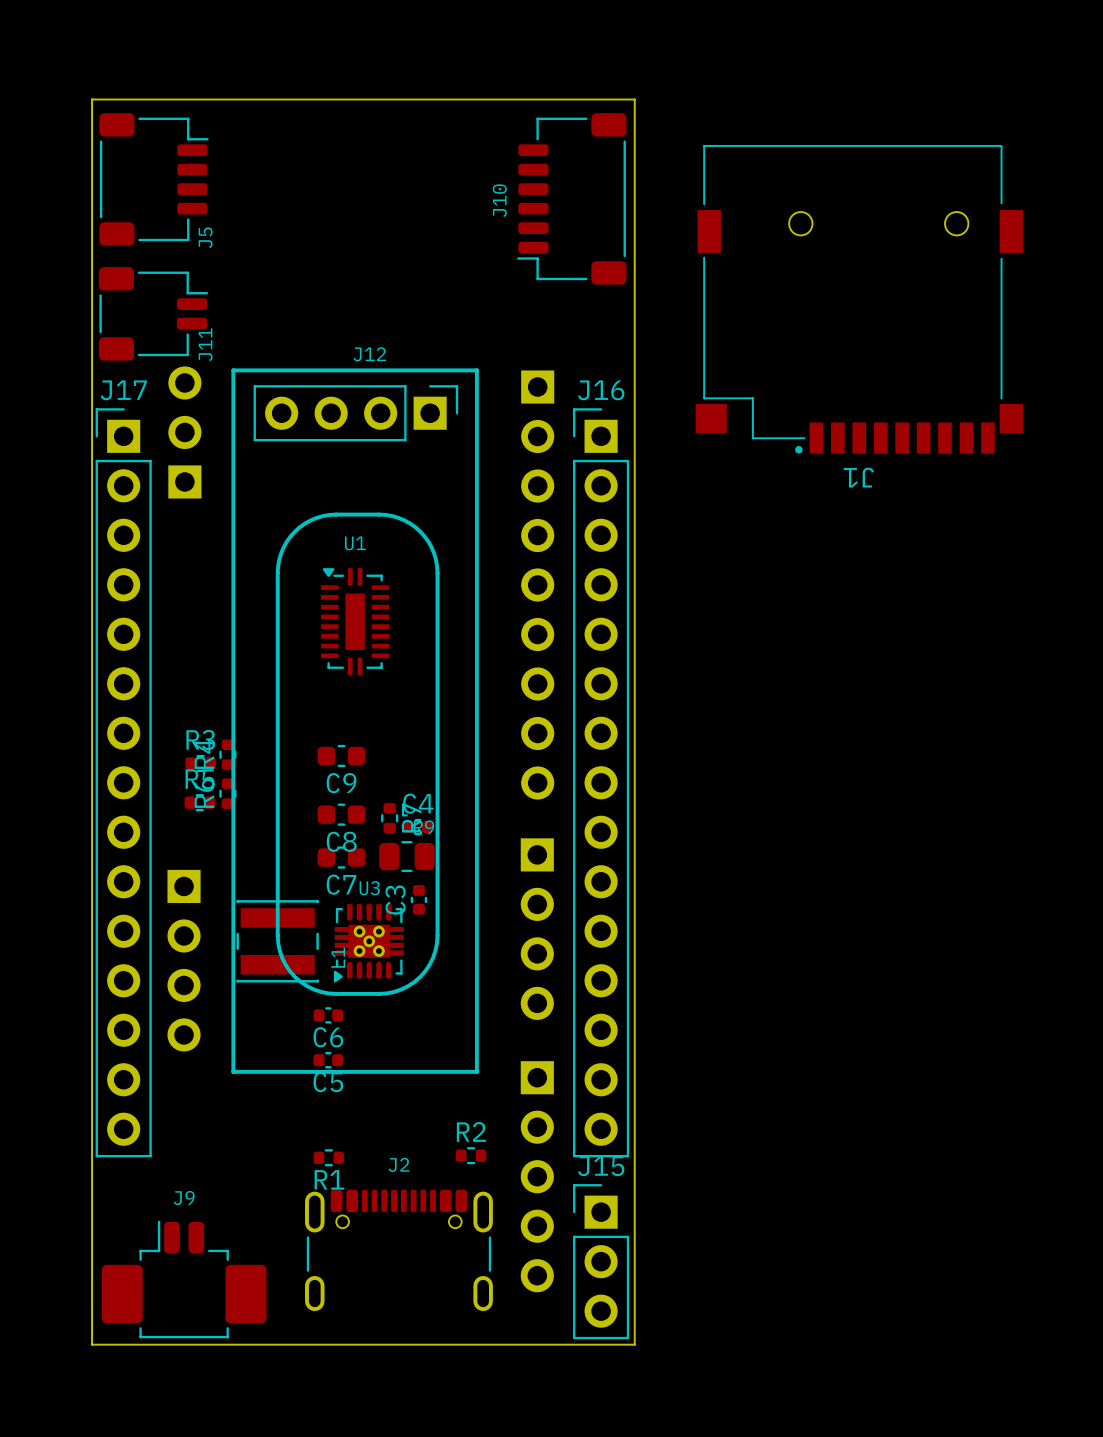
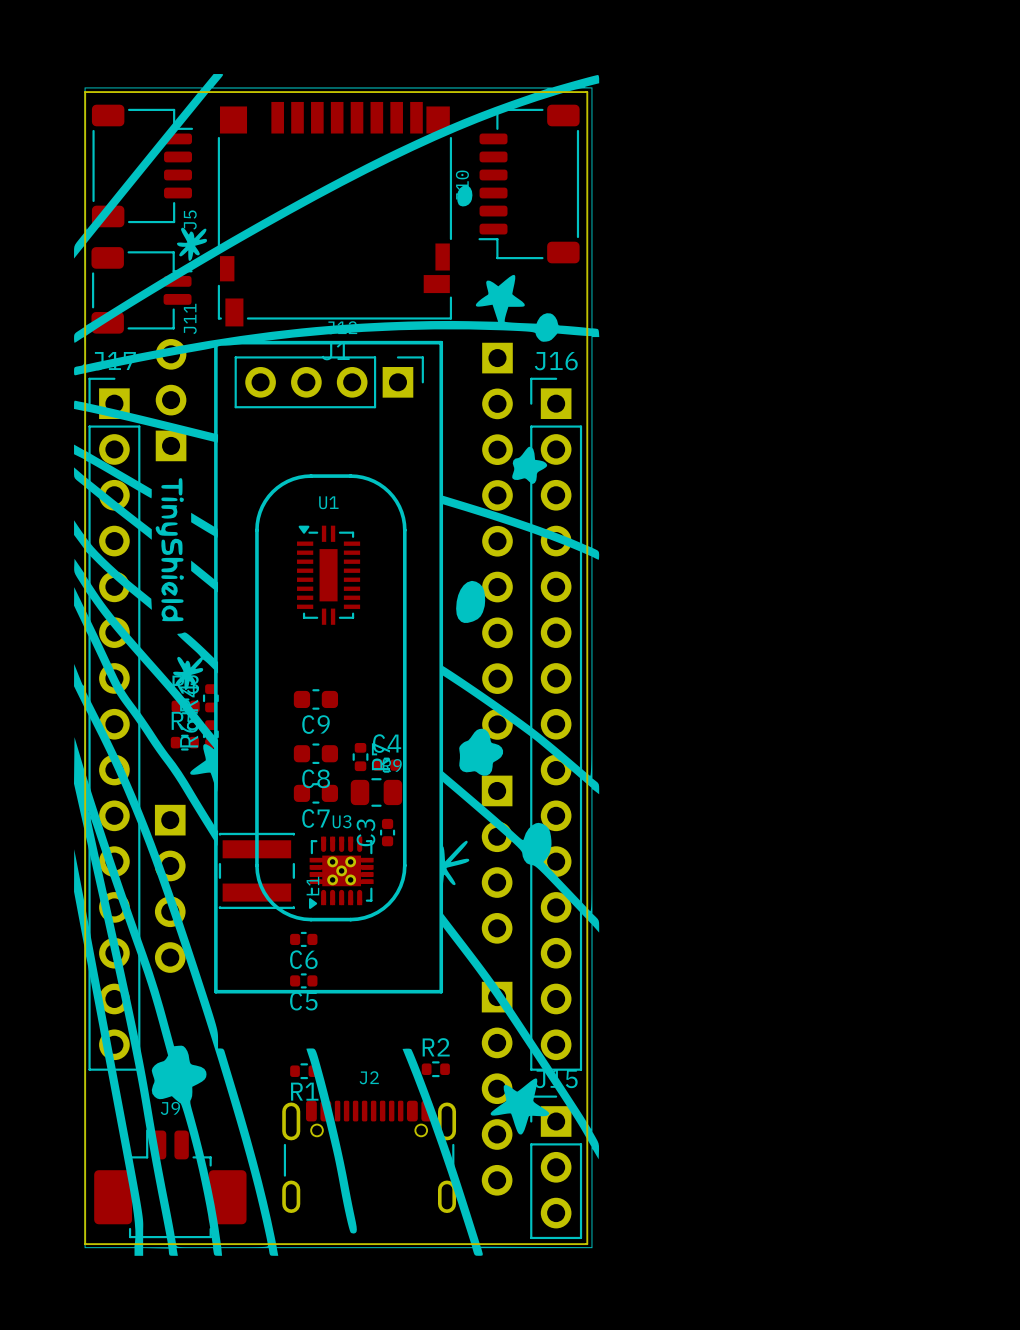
drawing: none -> [74, 74, 600, 1256]
J1 footprint: [695, 144, 1023, 454] -> [217, 101, 453, 327]

